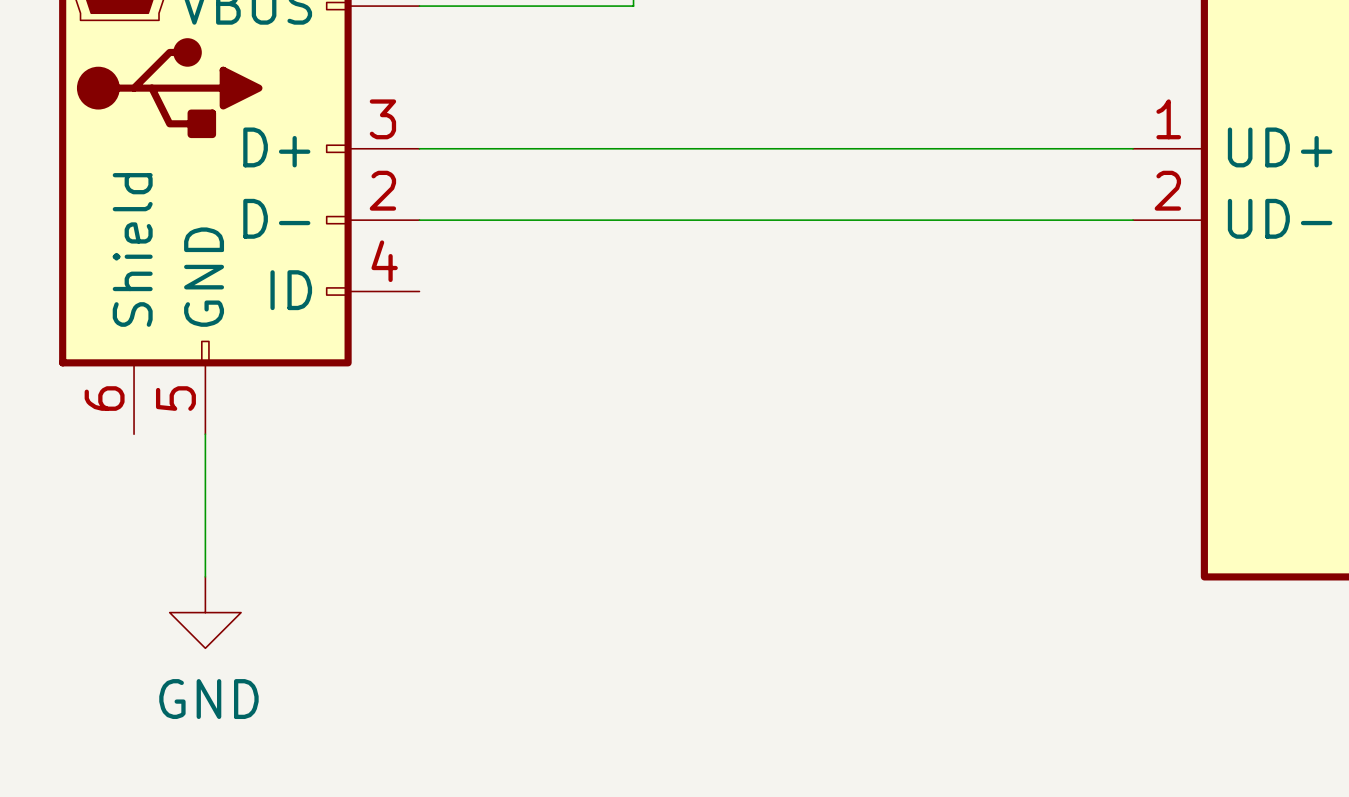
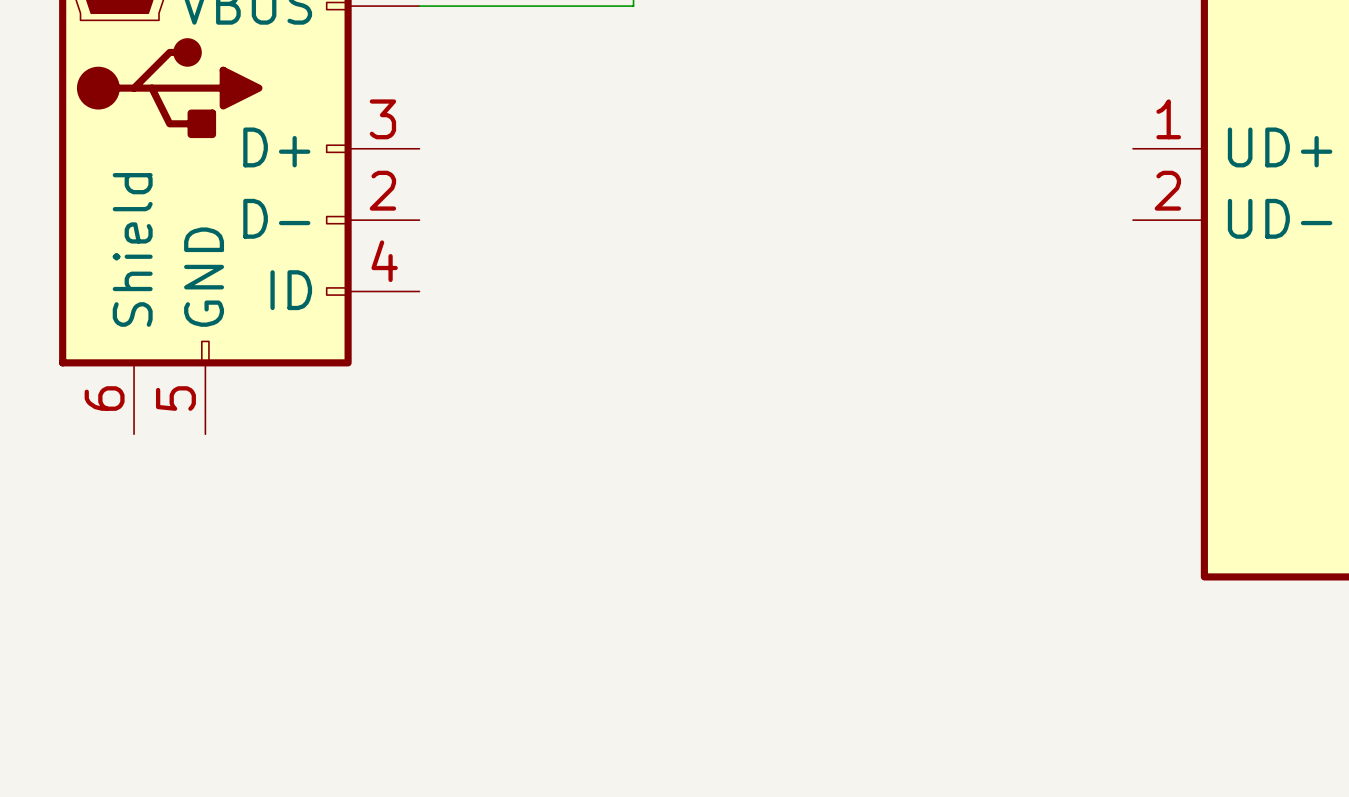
wire: (419, 148) (1133, 148) -> none
wire: (419, 220) (1133, 220) -> none
wire: (205, 434) (205, 576) -> none
power symbol: GND (205, 612) -> none

